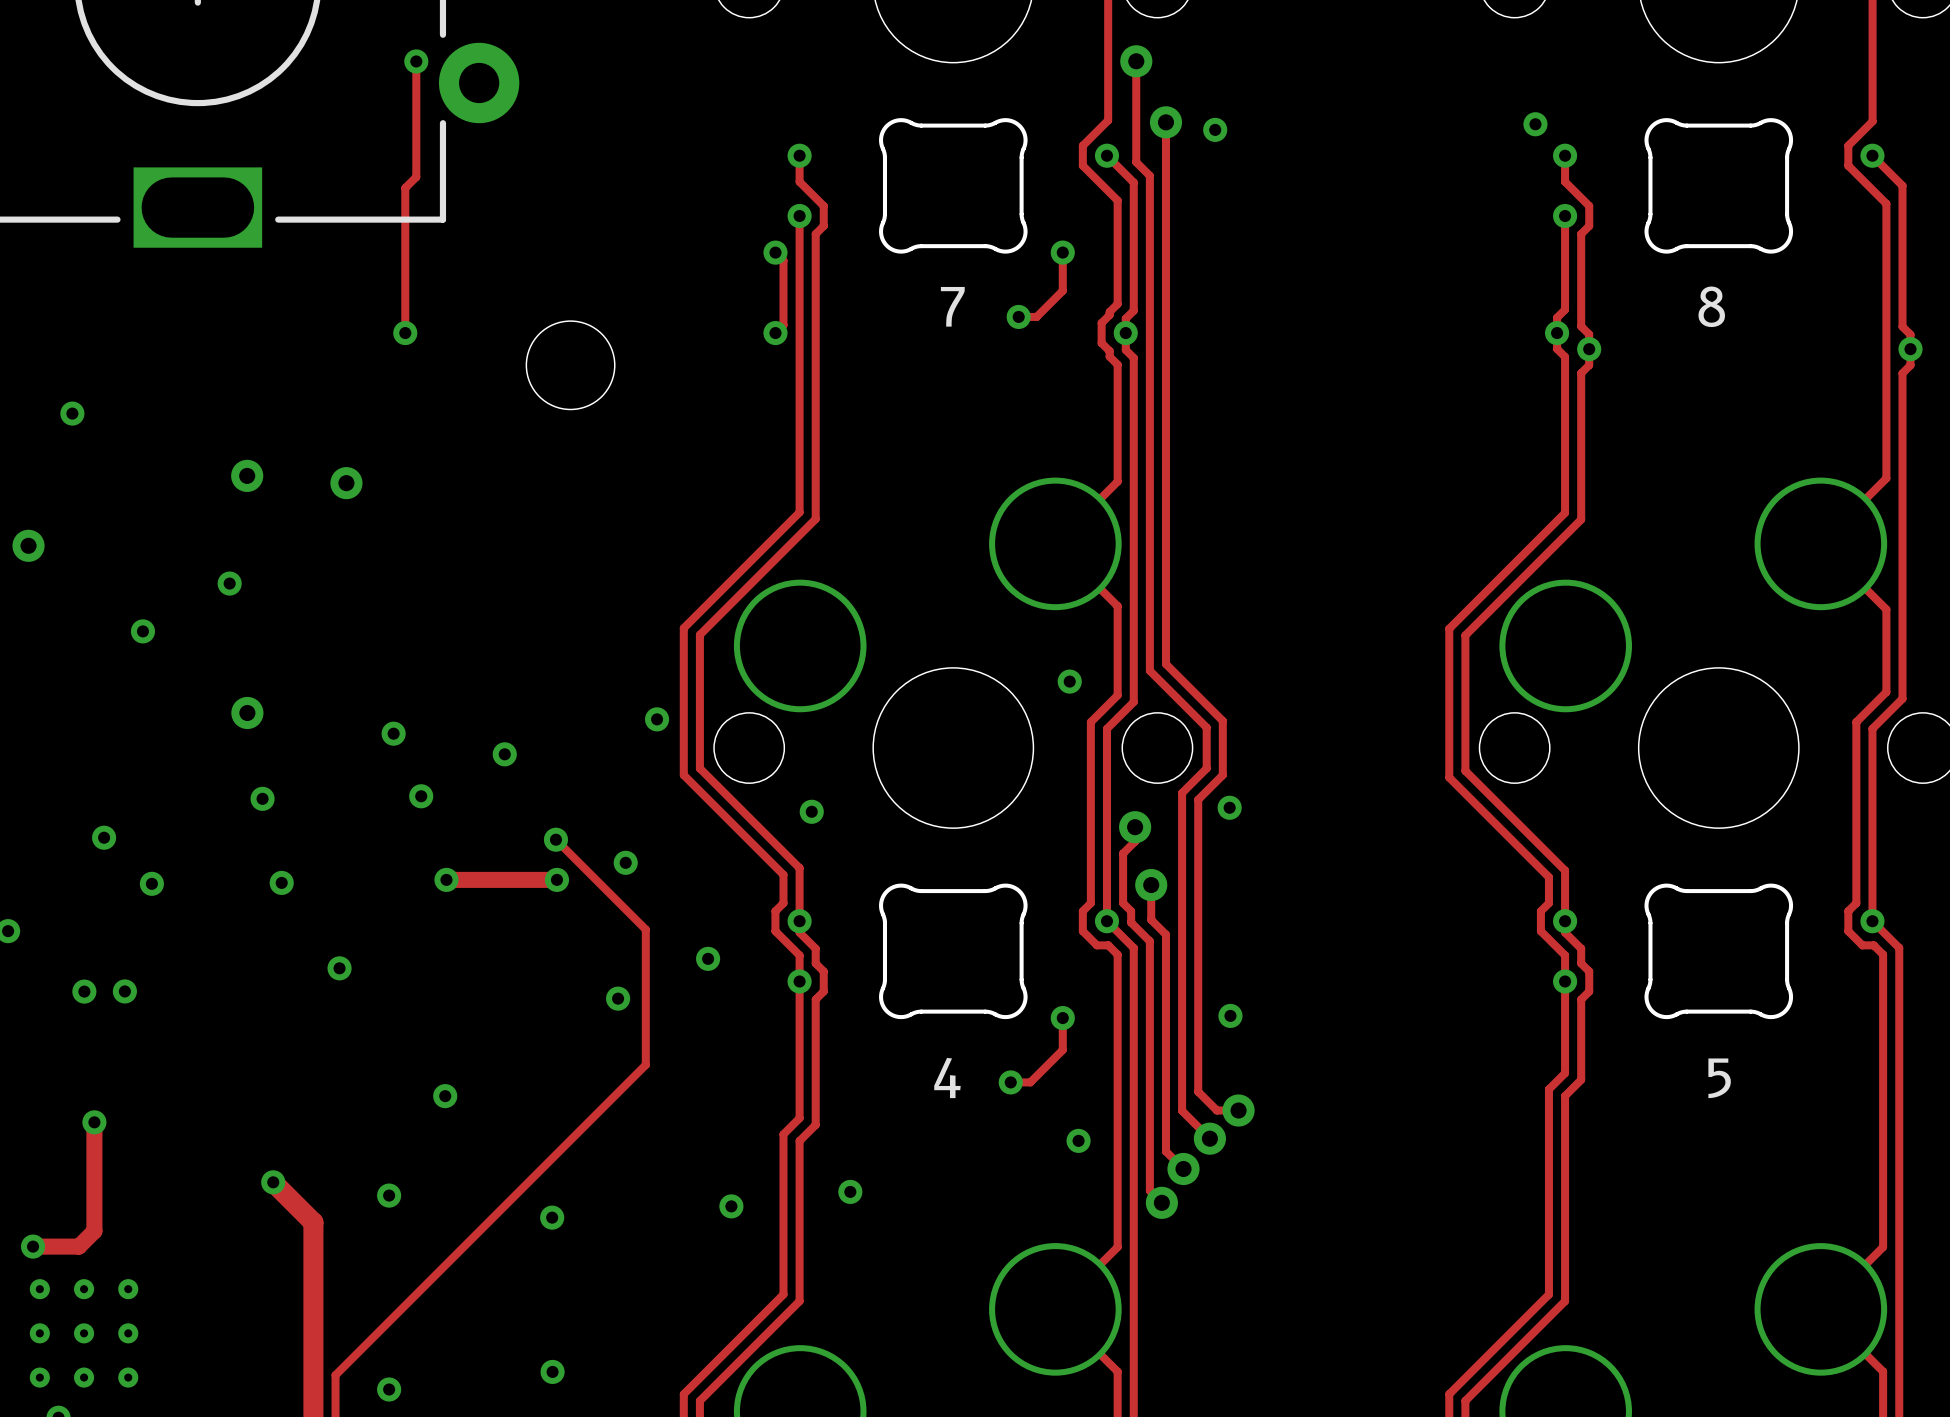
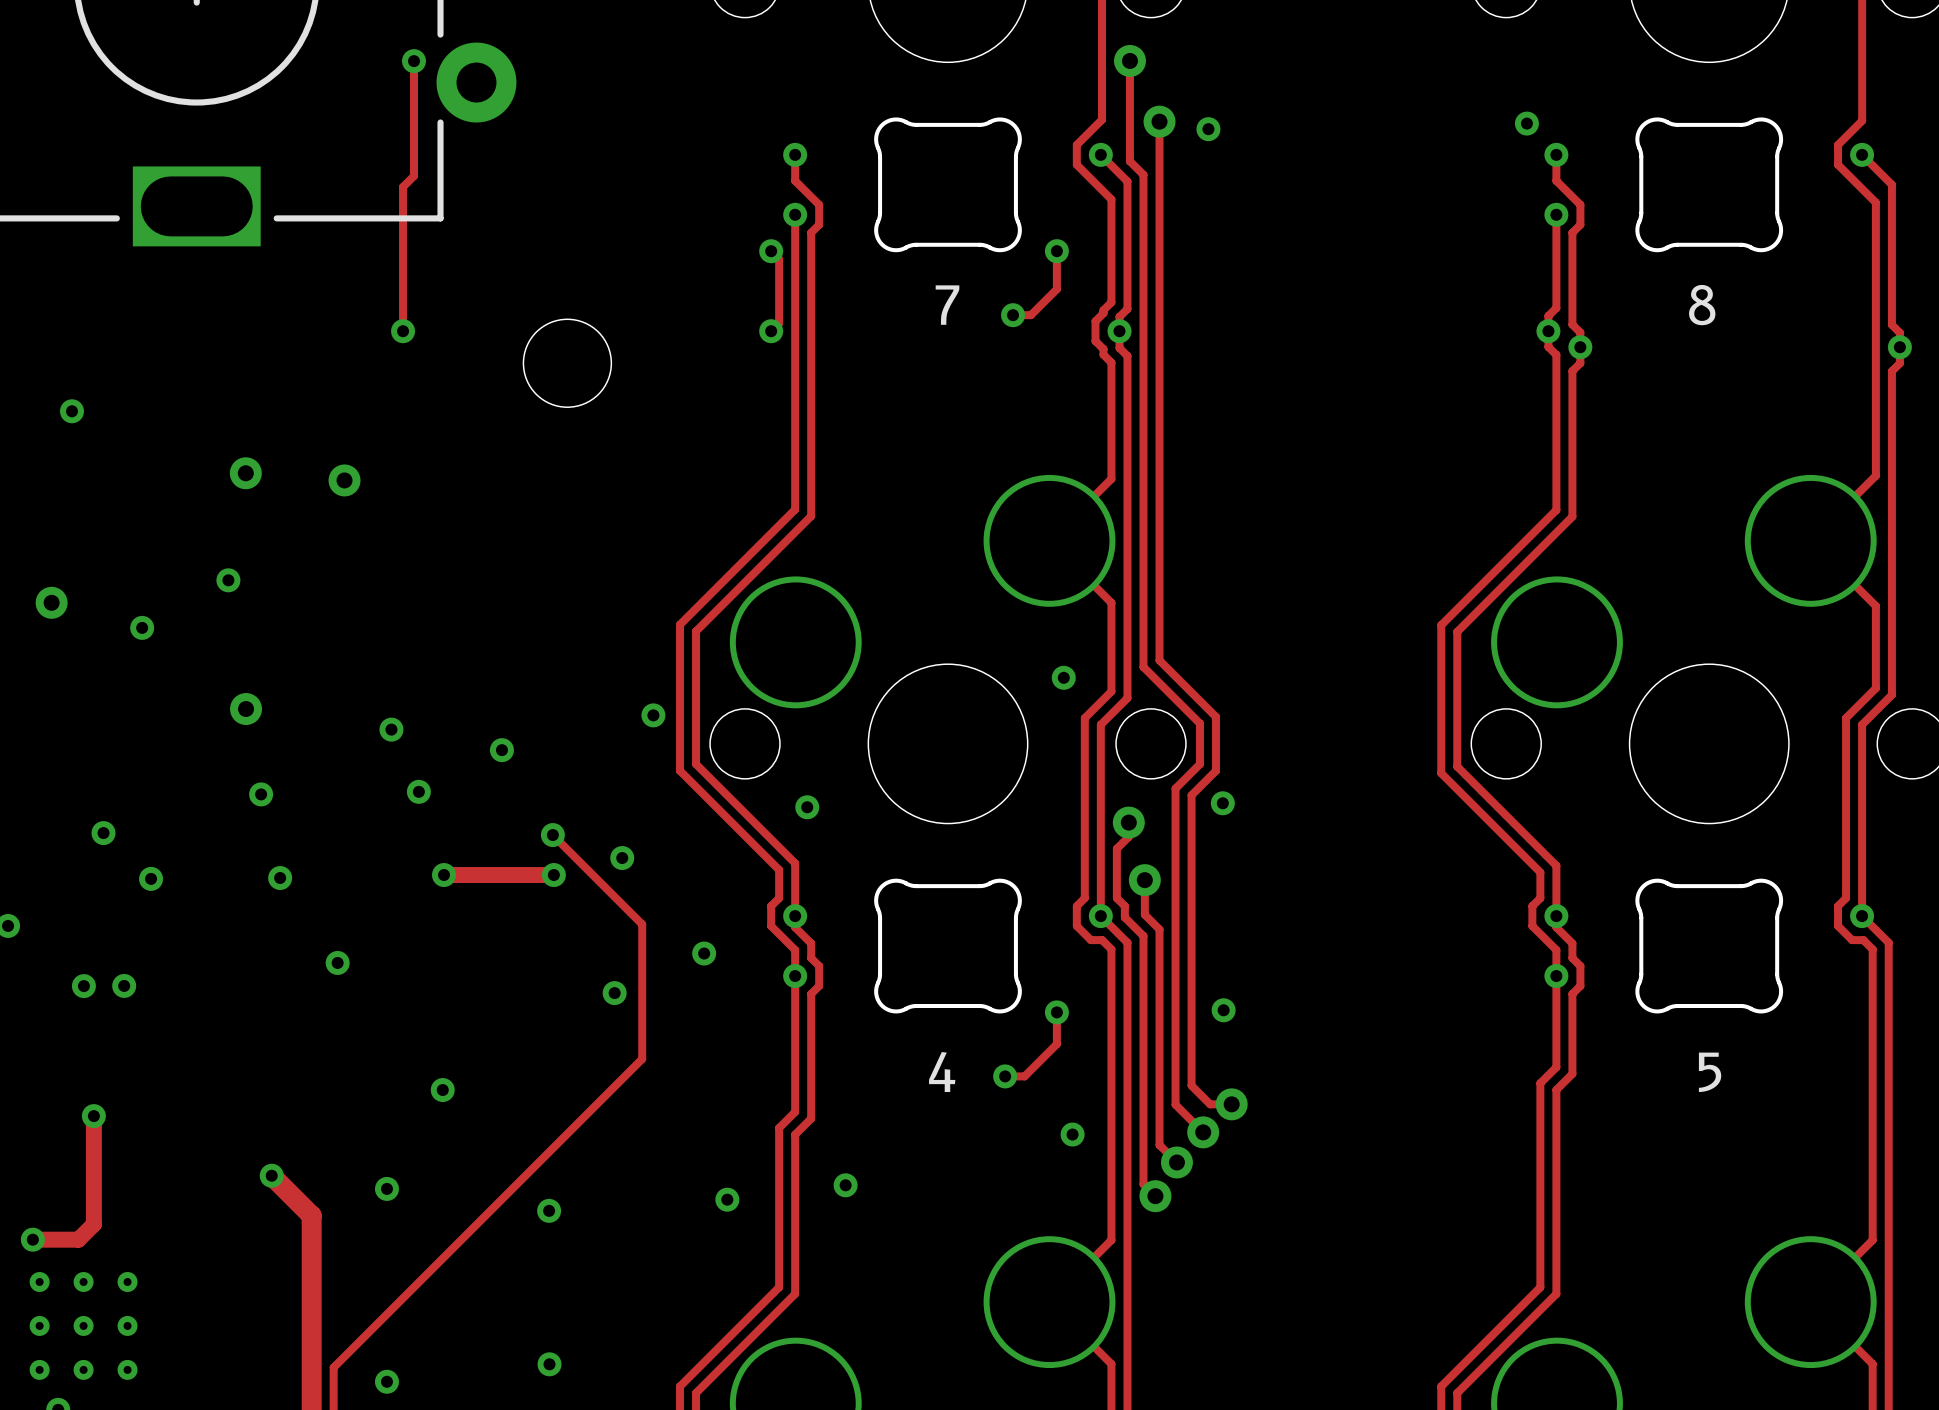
via position: (28, 545) -> (51, 602)

